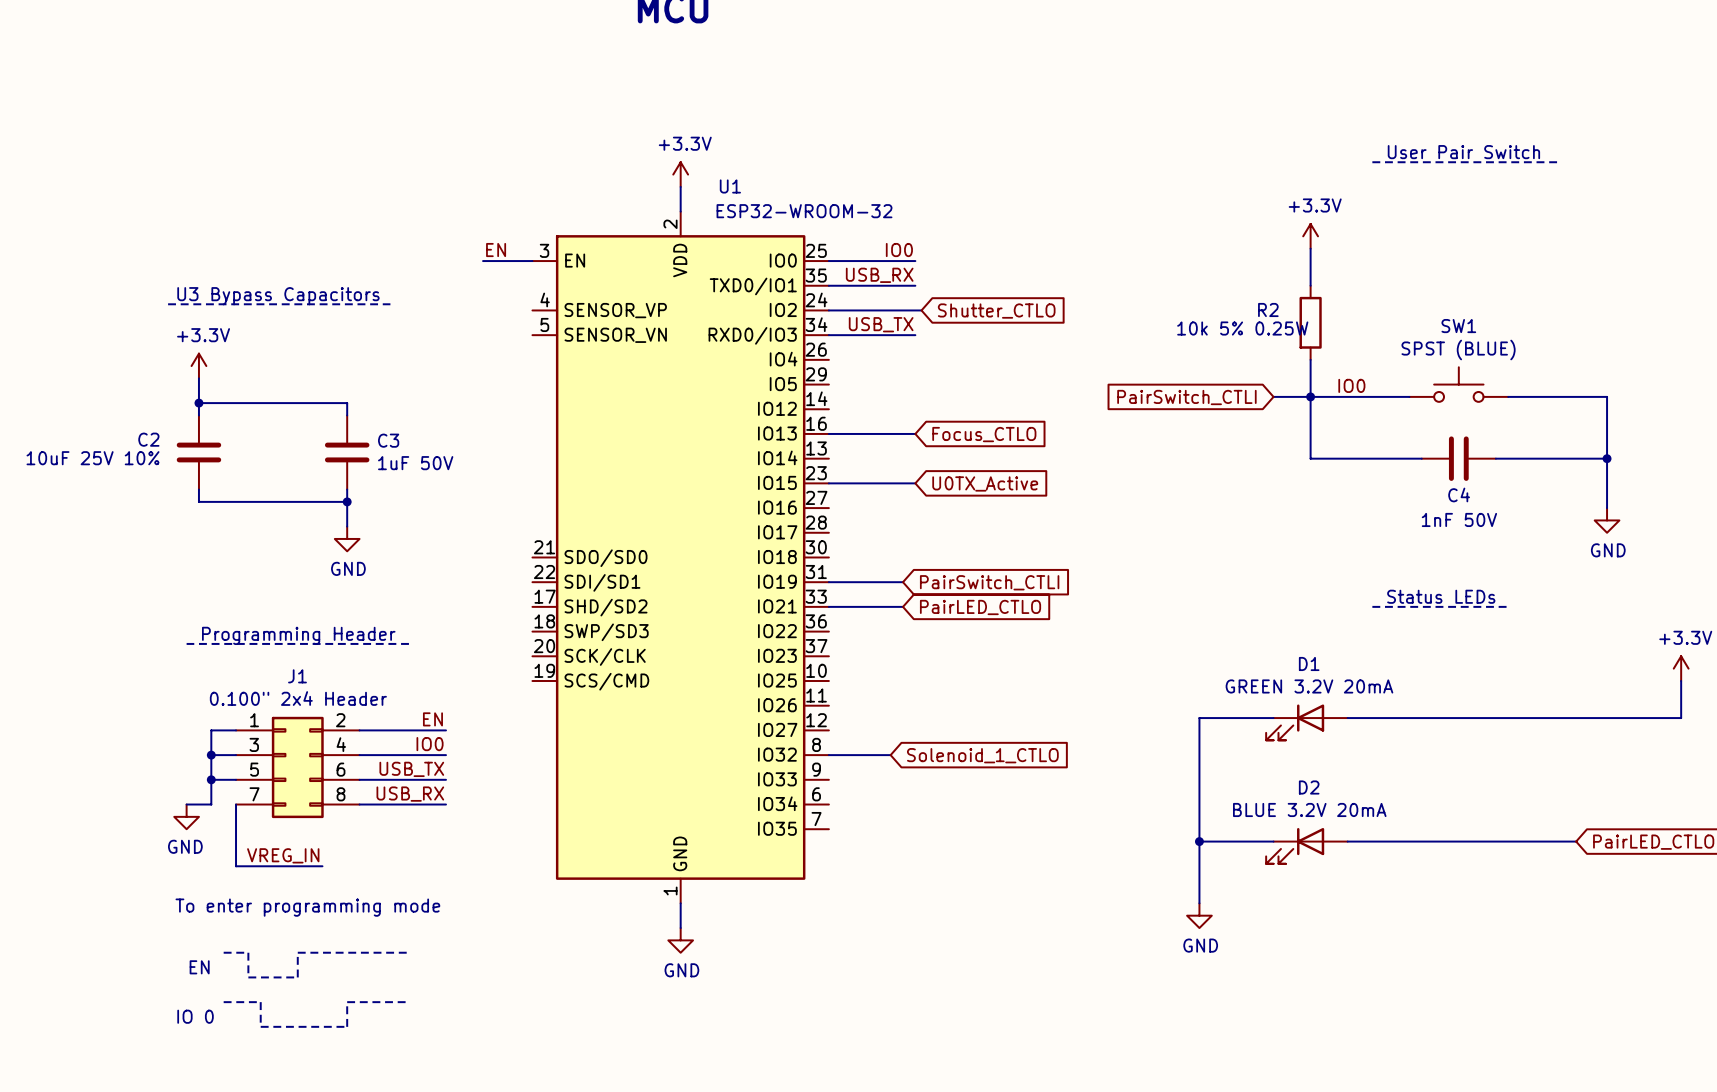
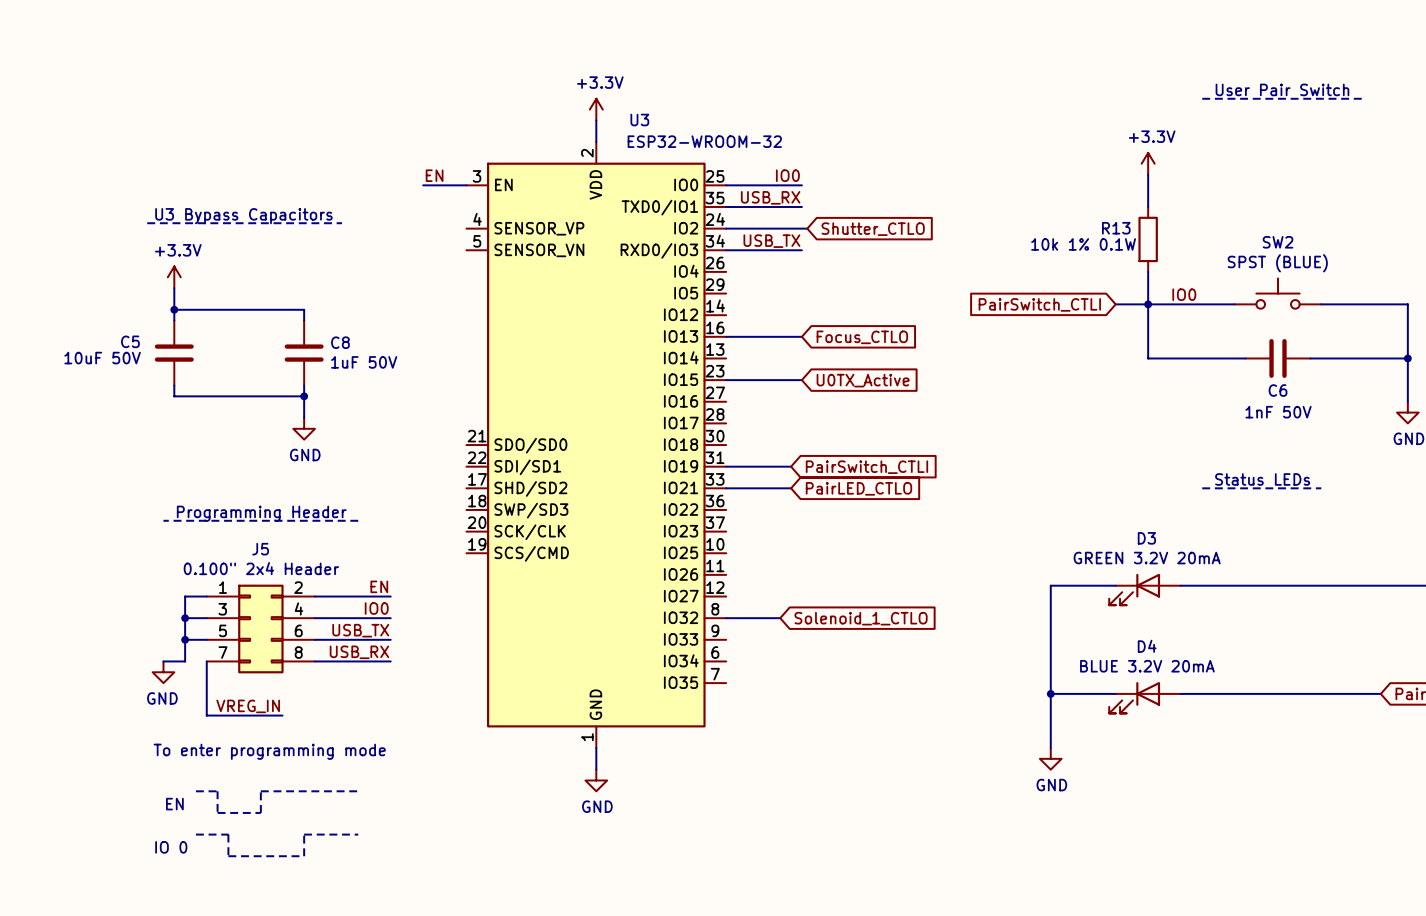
U1 name: U1 (730, 186) -> U3 (639, 120)
R2 name: R2 (1268, 309) -> R13 (1116, 228)
SW1 name: SW1 (1458, 326) -> SW2 (1278, 242)
R2 value: 10k 5% 0.25W (1242, 328) -> 10k 1% 0.1W (1083, 244)
C2 name: C2 (148, 439) -> C5 (130, 341)
C3 name: C3 (388, 440) -> C8 (340, 342)
C2 value: 10uF 25V 10% (93, 458) -> 10uF 50V (102, 358)
C4 name: C4 (1459, 494) -> C6 (1278, 390)
D1 name: D1 (1309, 663) -> D3 (1146, 538)
J1 name: J1 (297, 676) -> J5 (260, 549)
D2 name: D2 (1309, 787) -> D4 (1147, 646)

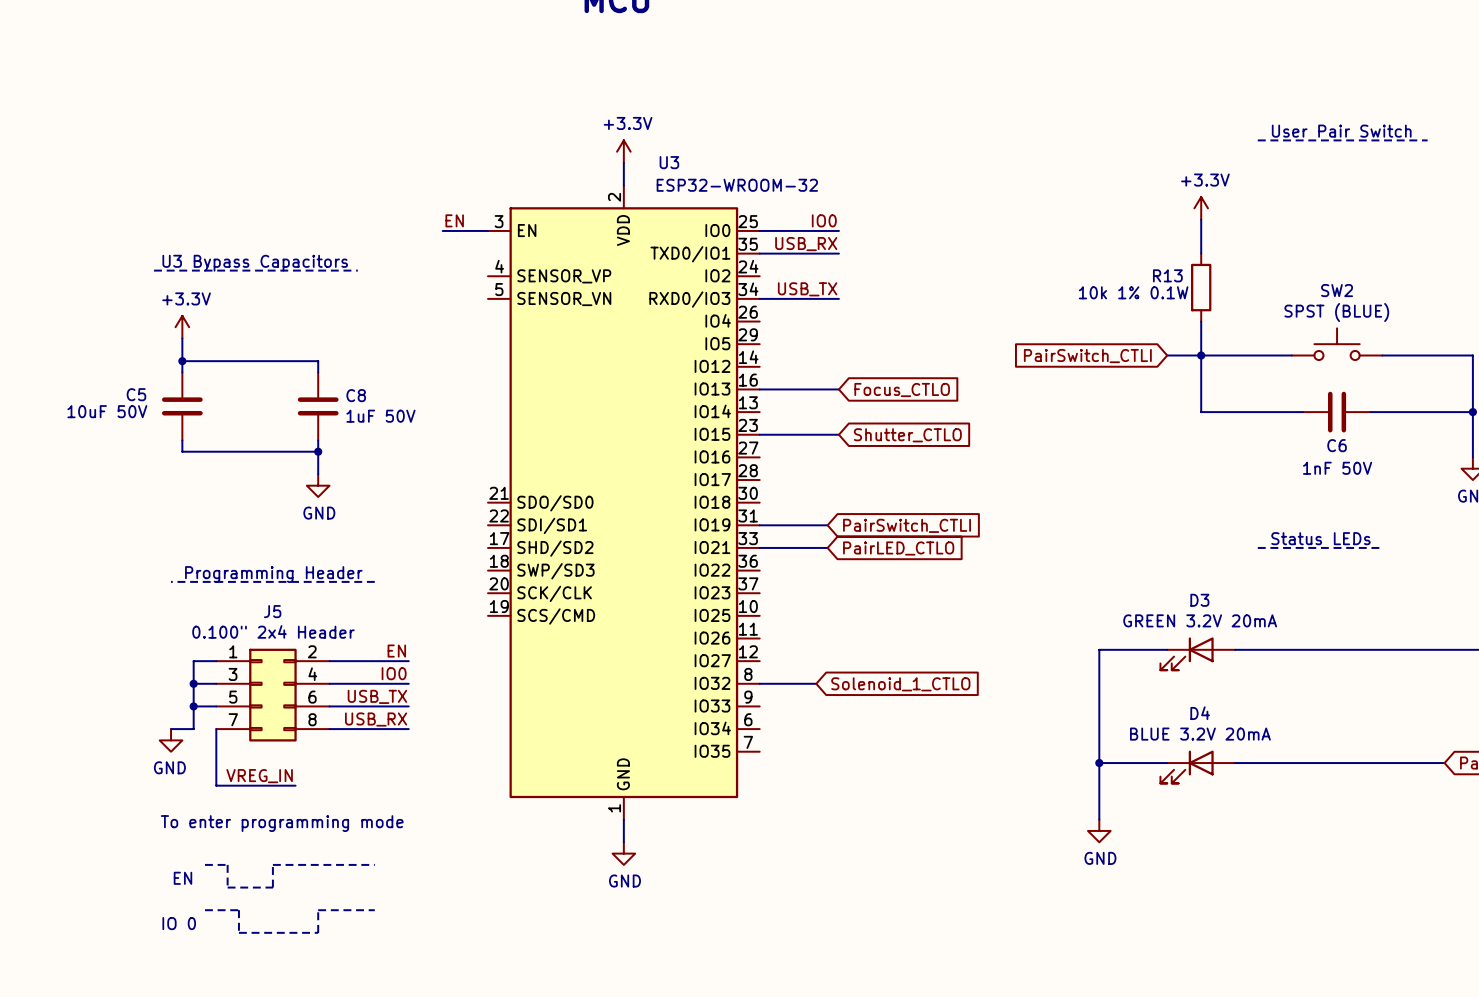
wire: (726, 228) (807, 228) -> none
global label: Shutter_CTLO (873, 229) -> none
label: IO0 (1184, 294) -> none
global label: U0TX_Active (863, 380) -> Shutter_CTLO (907, 435)

